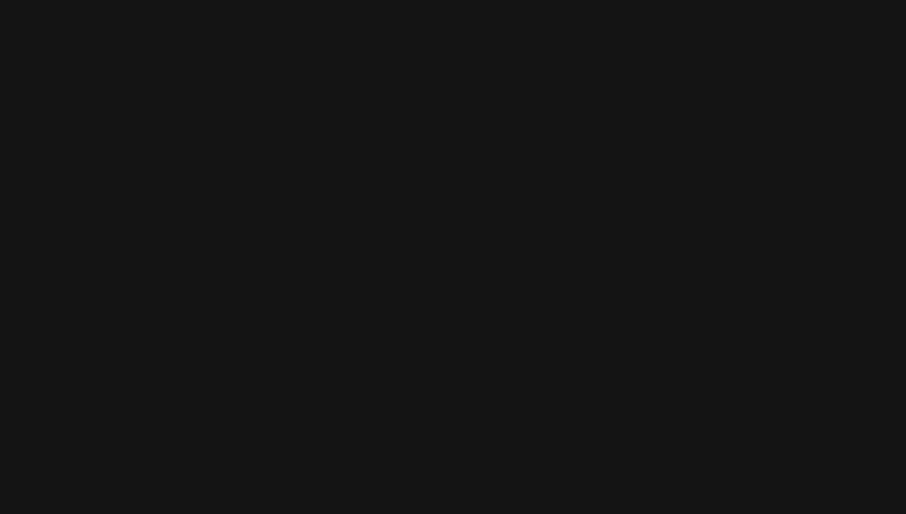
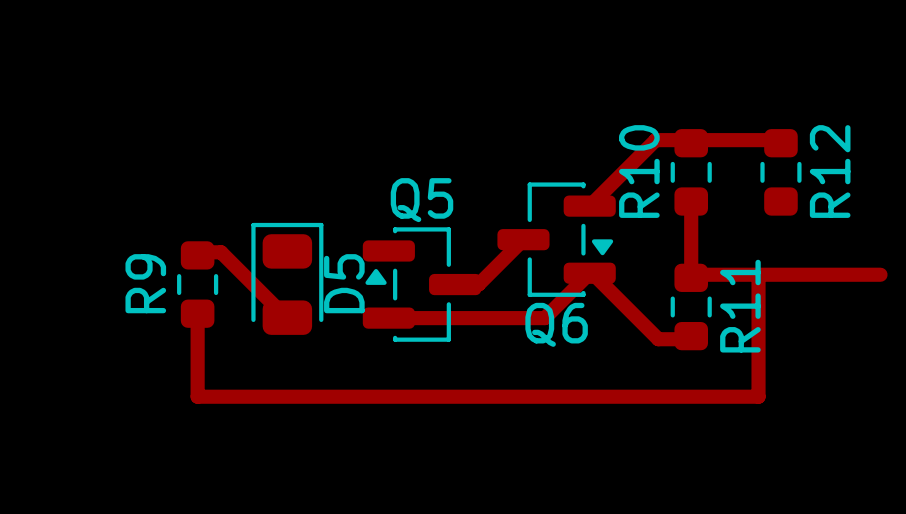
track: none -> (780, 140) (655, 140) (589, 206)
R10: none -> (691, 172)
R12: none -> (780, 172)
track: none -> (691, 204) (691, 274) (880, 274)
track: none -> (523, 239) (478, 284) (455, 284)
Q6: none -> (556, 239)
track: none -> (197, 252) (221, 252) (286, 316)
track: none -> (758, 274) (758, 396) (197, 396) (197, 316)
D5: none -> (287, 278)
R9: none -> (197, 284)
Q5: none -> (421, 284)
R11: none -> (691, 306)
track: none -> (388, 318) (544, 318) (591, 271) (658, 339) (691, 339)

